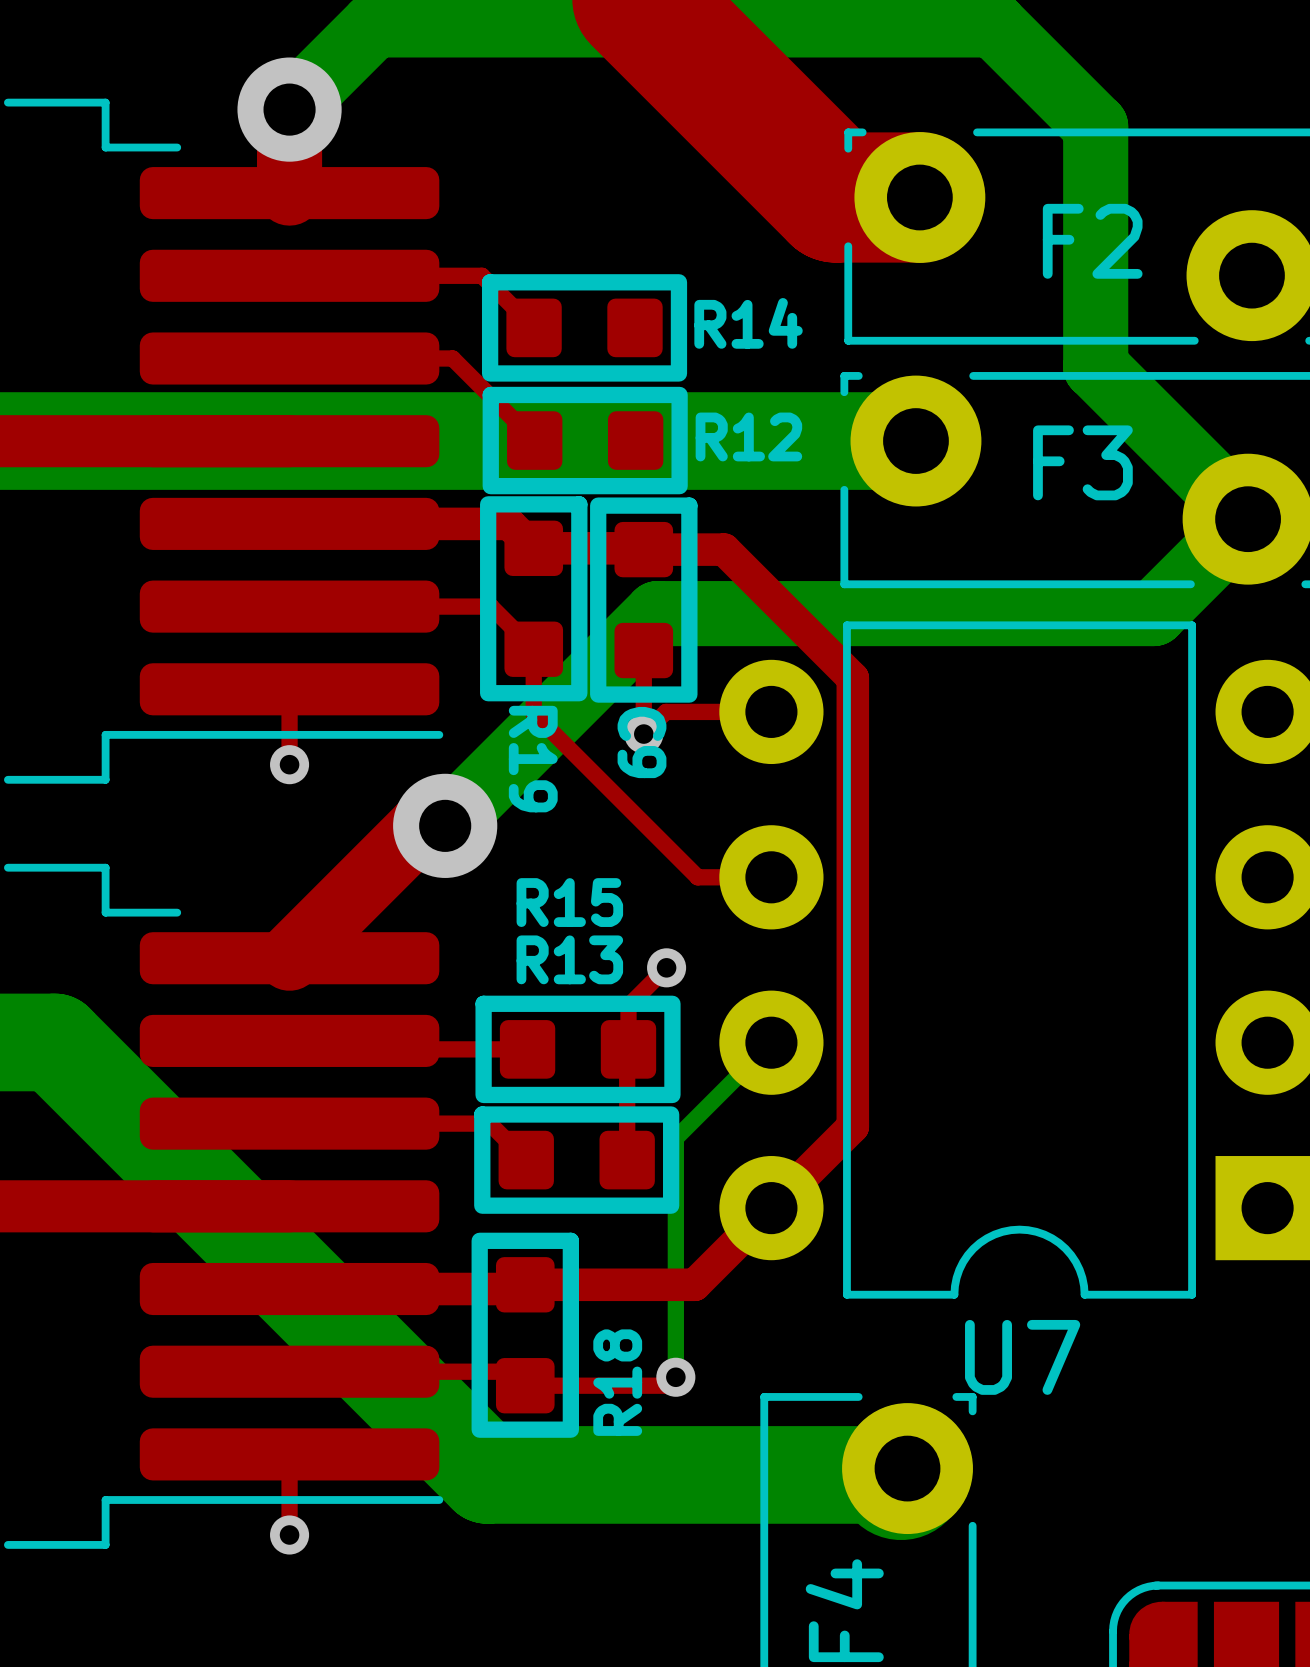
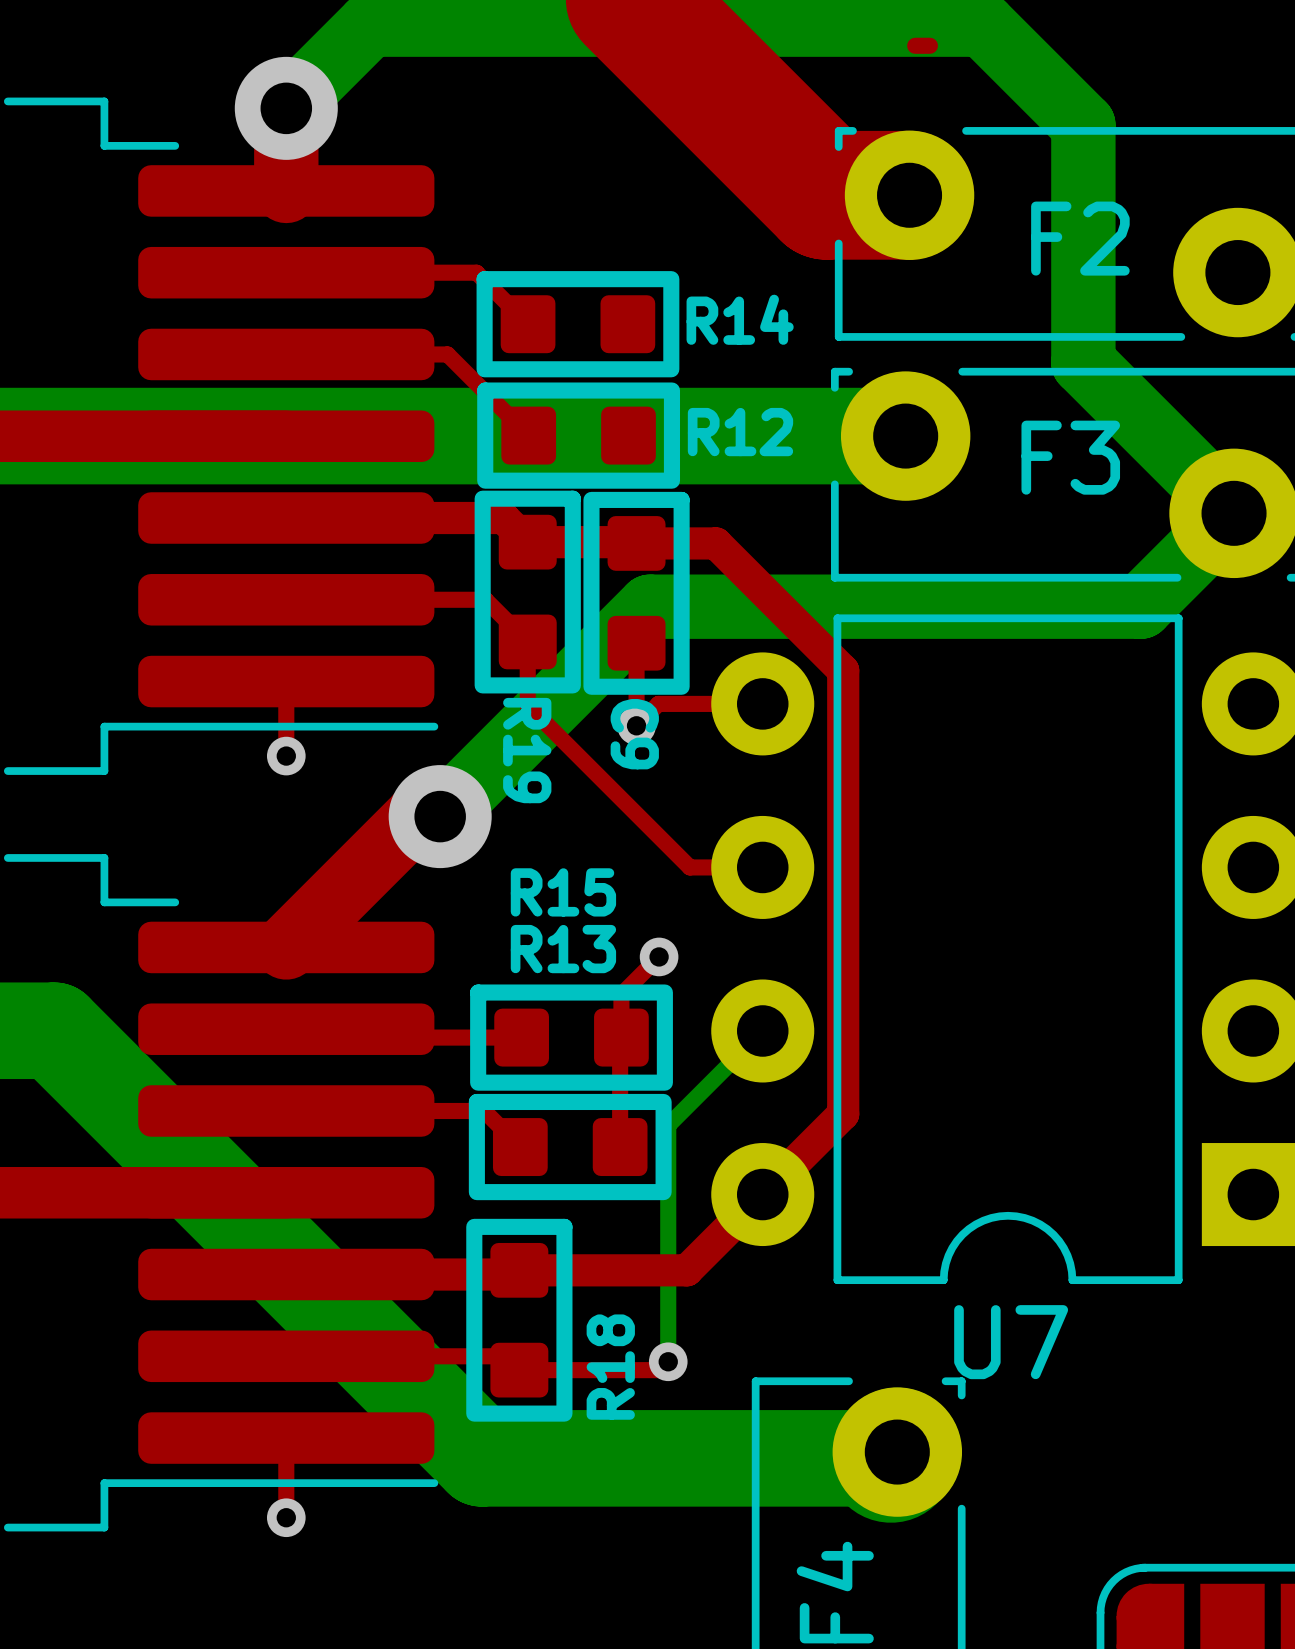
top track: none -> (915, 45) (929, 45)

